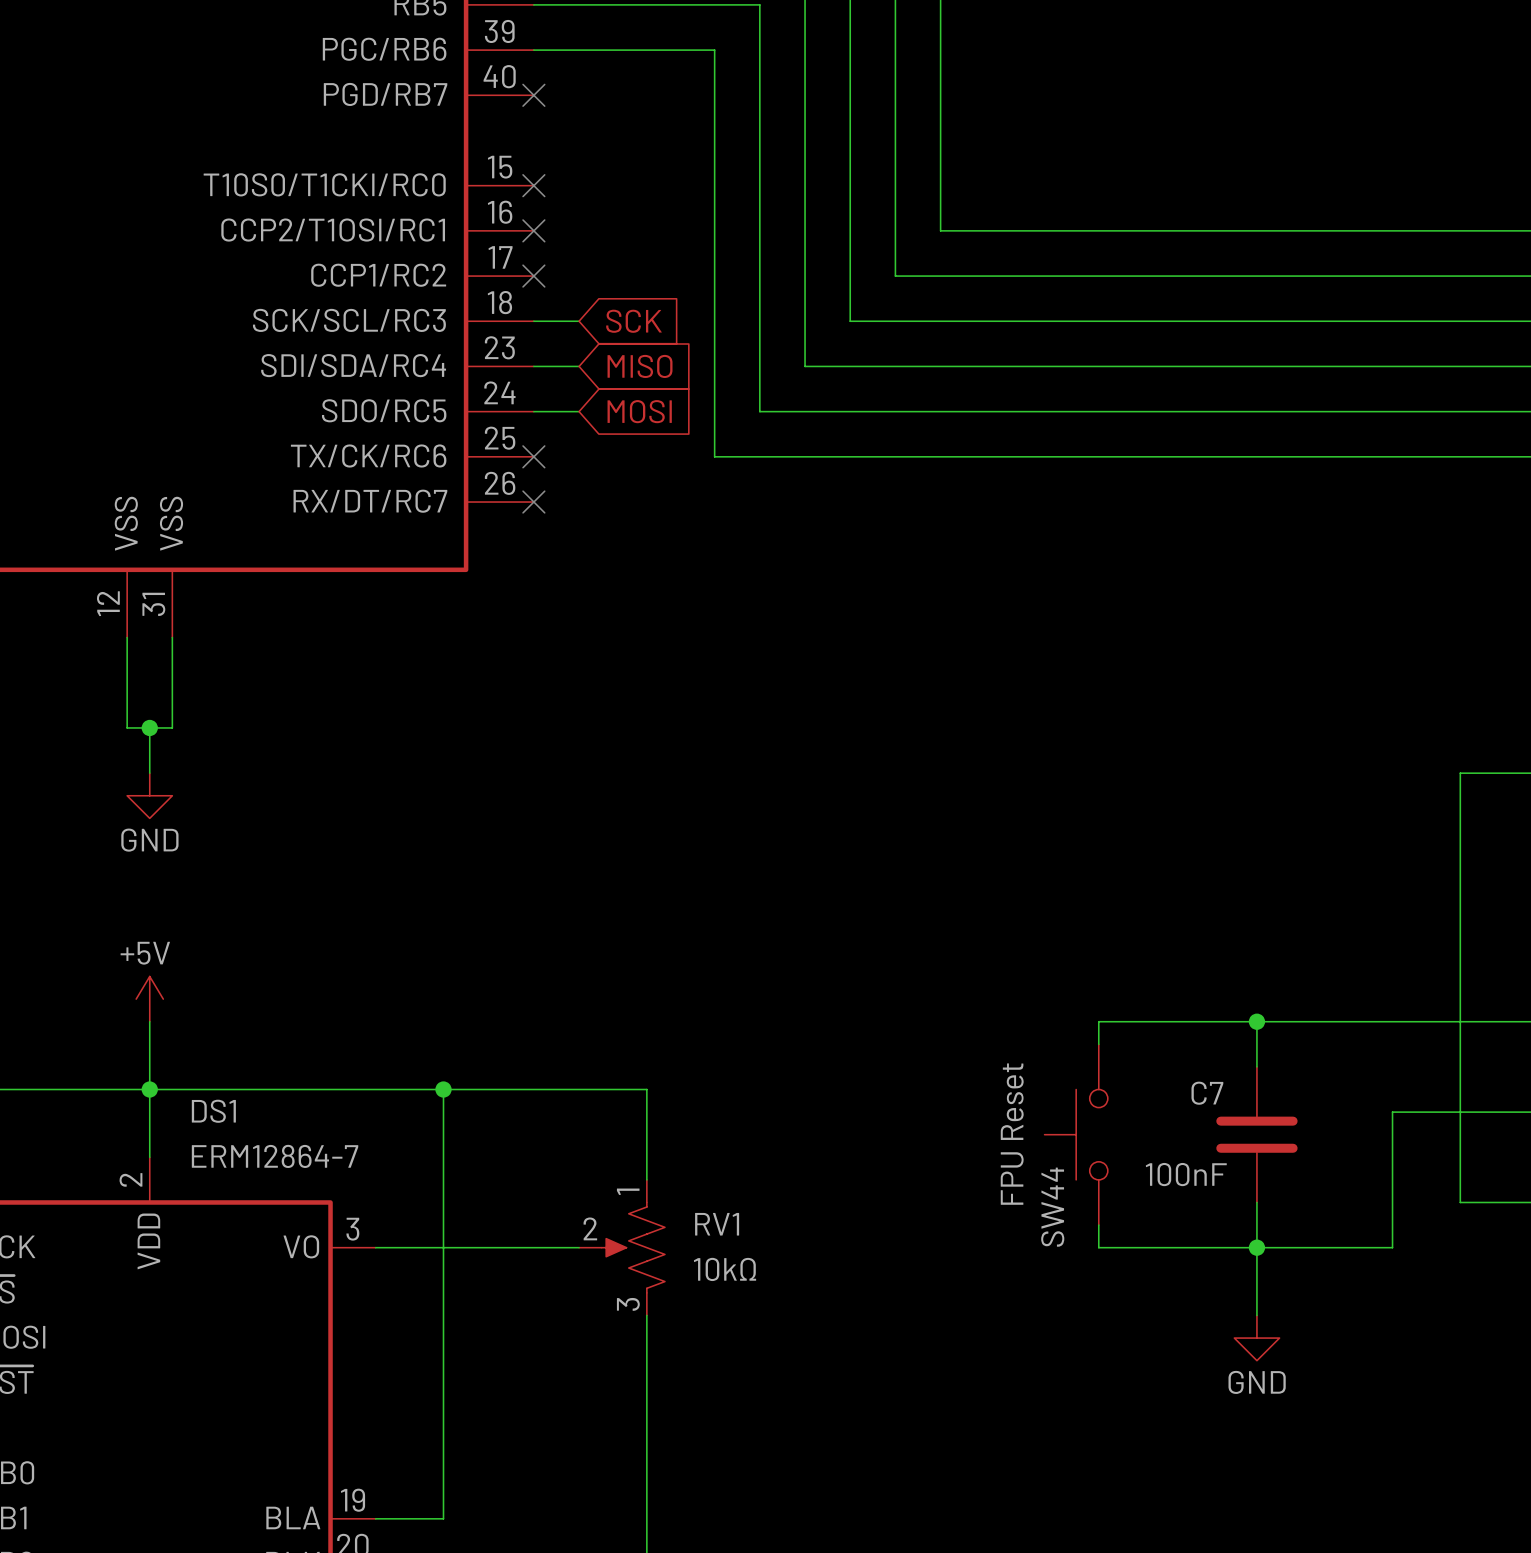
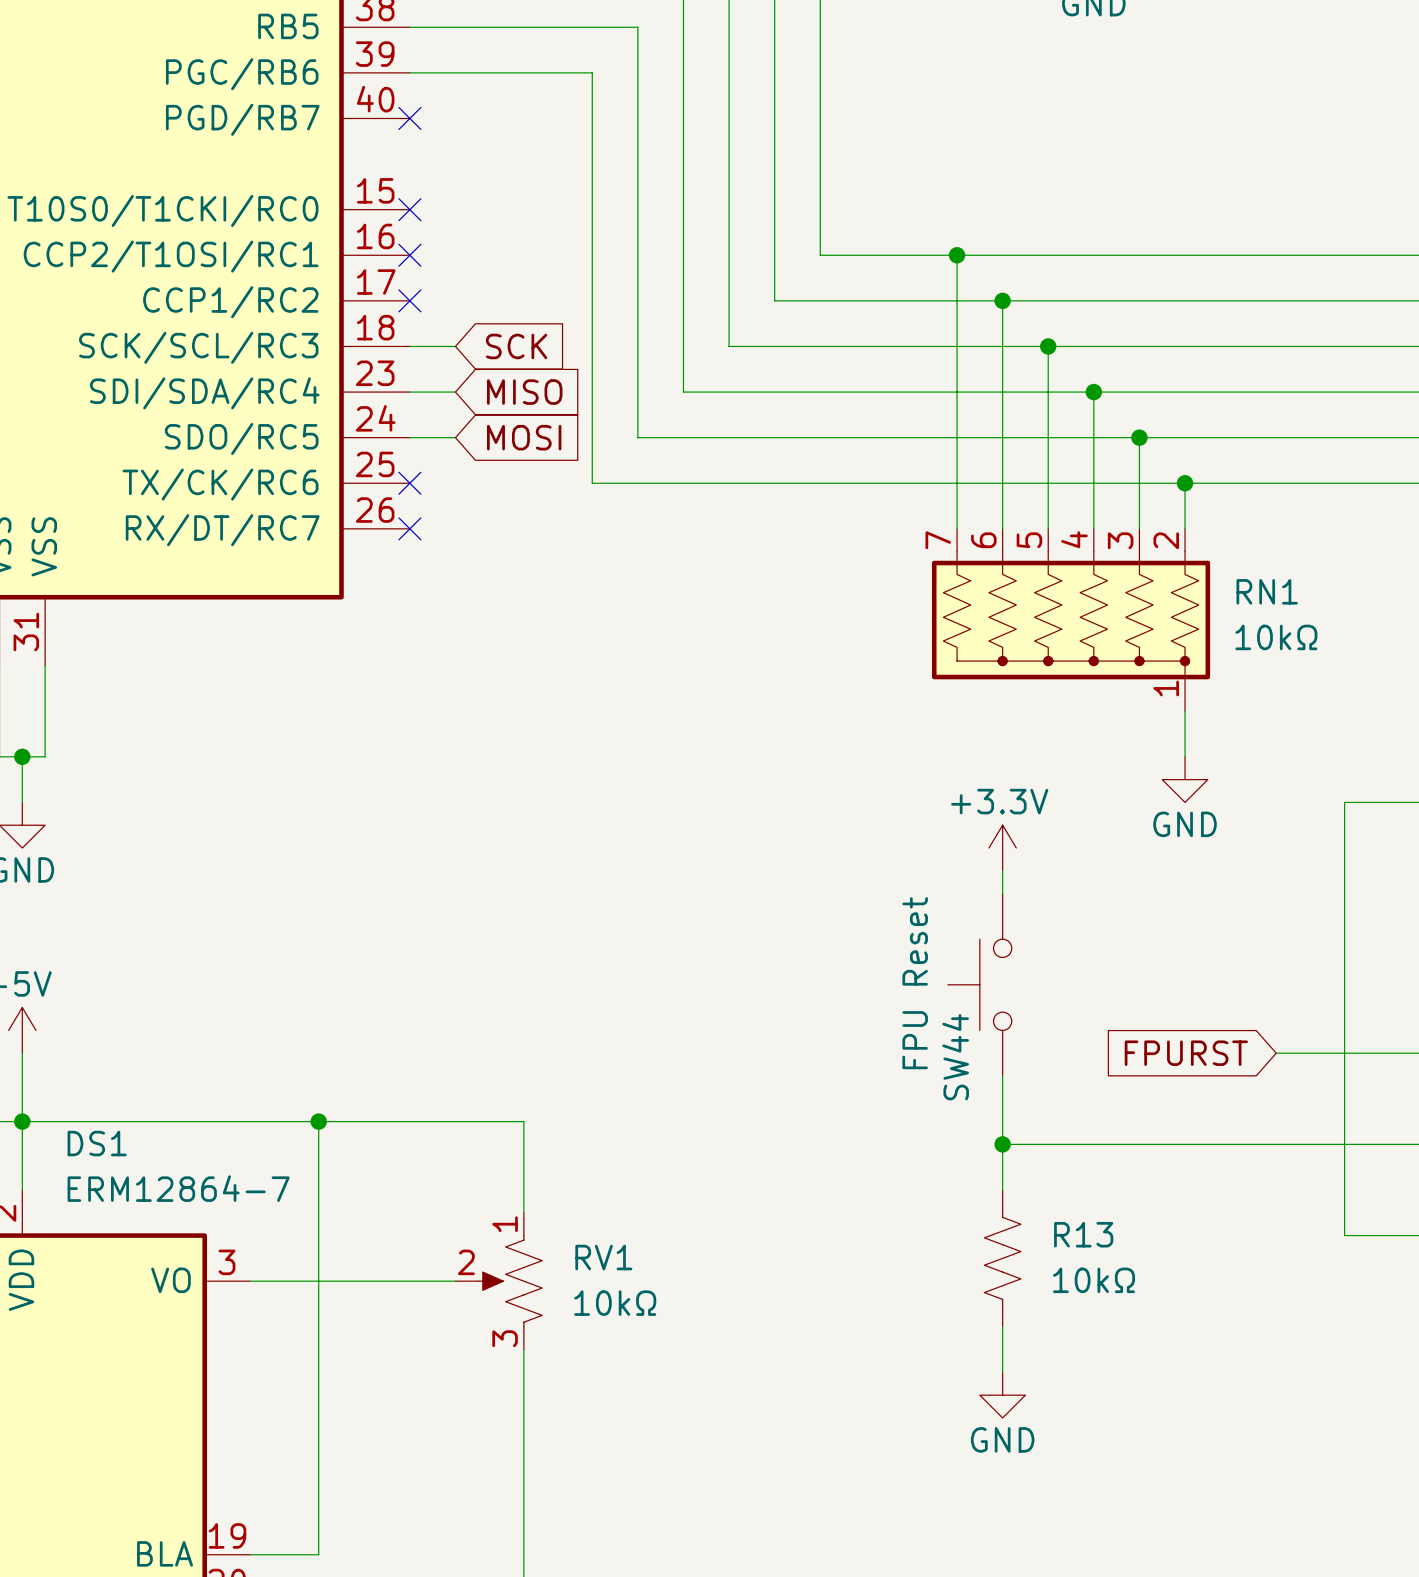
wire: none -> (957, 255) (957, 528)
junction: none -> (957, 255)
wire: none -> (1002, 300) (1002, 528)
junction: none -> (1002, 300)
wire: none -> (1048, 346) (1048, 528)
junction: none -> (1048, 346)
wire: none -> (1093, 392) (1093, 528)
junction: none -> (1093, 392)
wire: none -> (1139, 437) (1139, 528)
junction: none -> (1139, 437)
wire: none -> (1185, 483) (1185, 528)
junction: none -> (1185, 483)
RN1: none -> 10kΩ (1071, 620)
wire: none -> (1185, 711) (1185, 756)
power symbol: none -> GND (1185, 779)
power symbol: none -> +3.3V (1002, 848)
wire: none -> (1002, 870) (1002, 893)
wire: (1256, 1021) (1256, 1066) -> (1002, 1326) (1002, 1372)
junction: (1256, 1021) -> none
global label: none -> FPURST (1186, 1053)
wire: (1392, 1021) (1098, 1021) (1098, 1044) -> none
junction: none -> (1002, 1144)
wire: (1392, 1112) (1392, 1247) (1098, 1247) (1098, 1225) -> (1276, 1144) (1002, 1144)
SW44 position: (1076, 1134) -> (979, 984)
C7: 100nF (1256, 1134) -> none
wire: (1256, 1202) (1256, 1315) -> (1002, 1076) (1002, 1189)
R13: none -> 10kΩ (1002, 1258)
junction: (1256, 1247) -> none
power symbol position: GND (1256, 1338) -> GND (1002, 1395)

